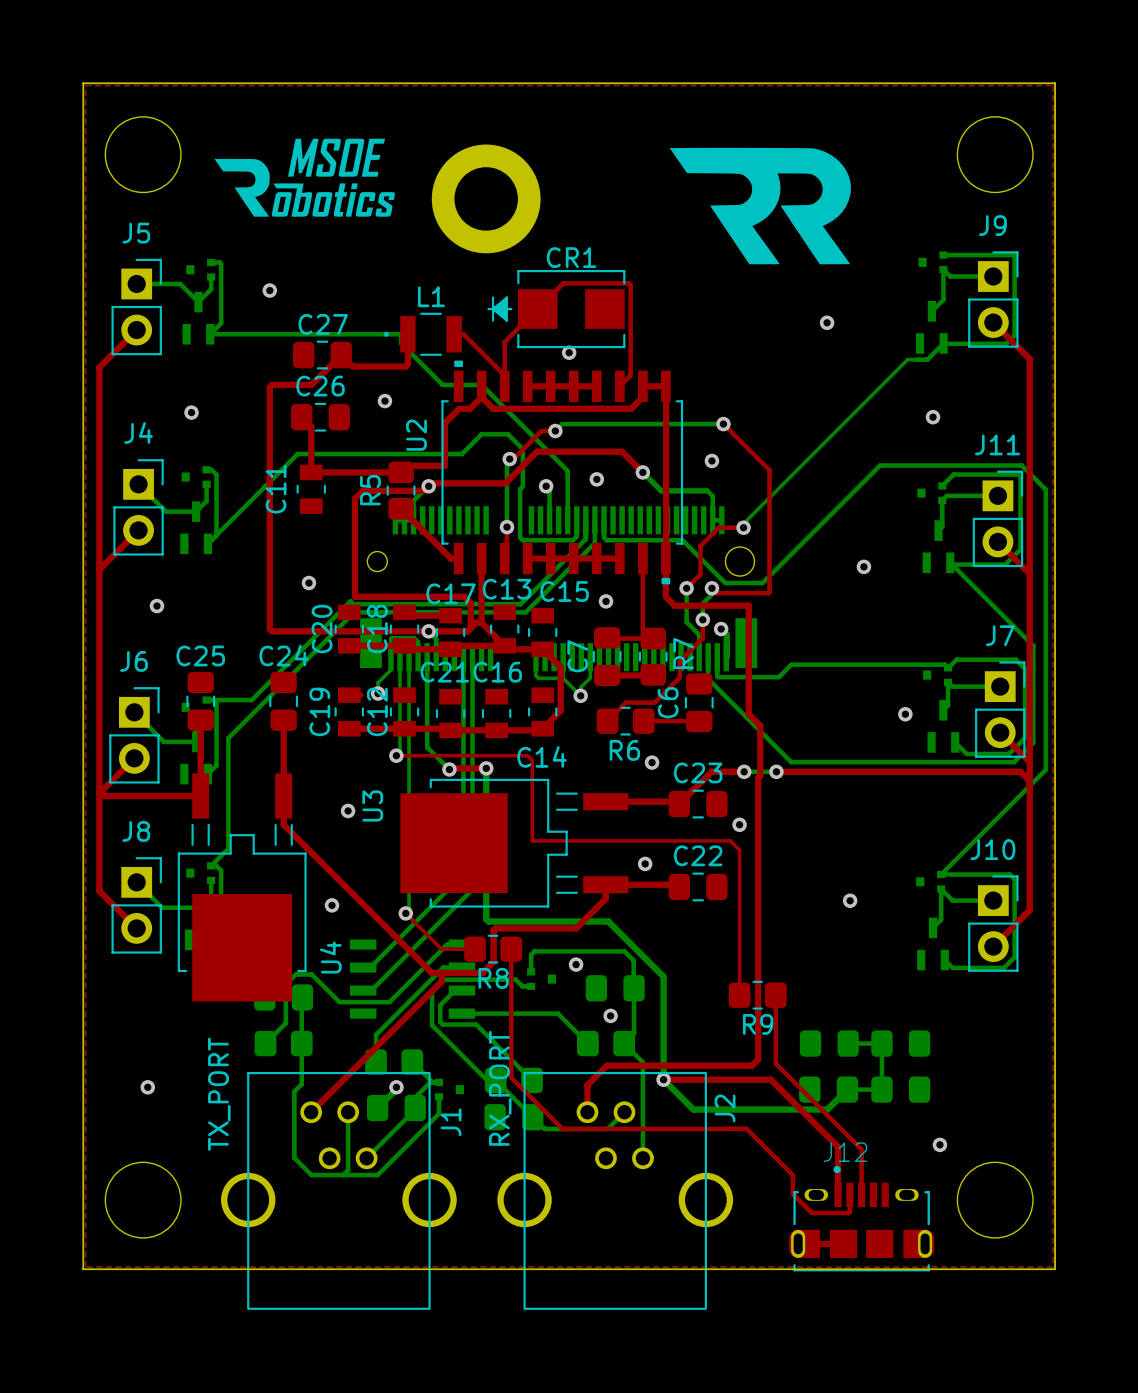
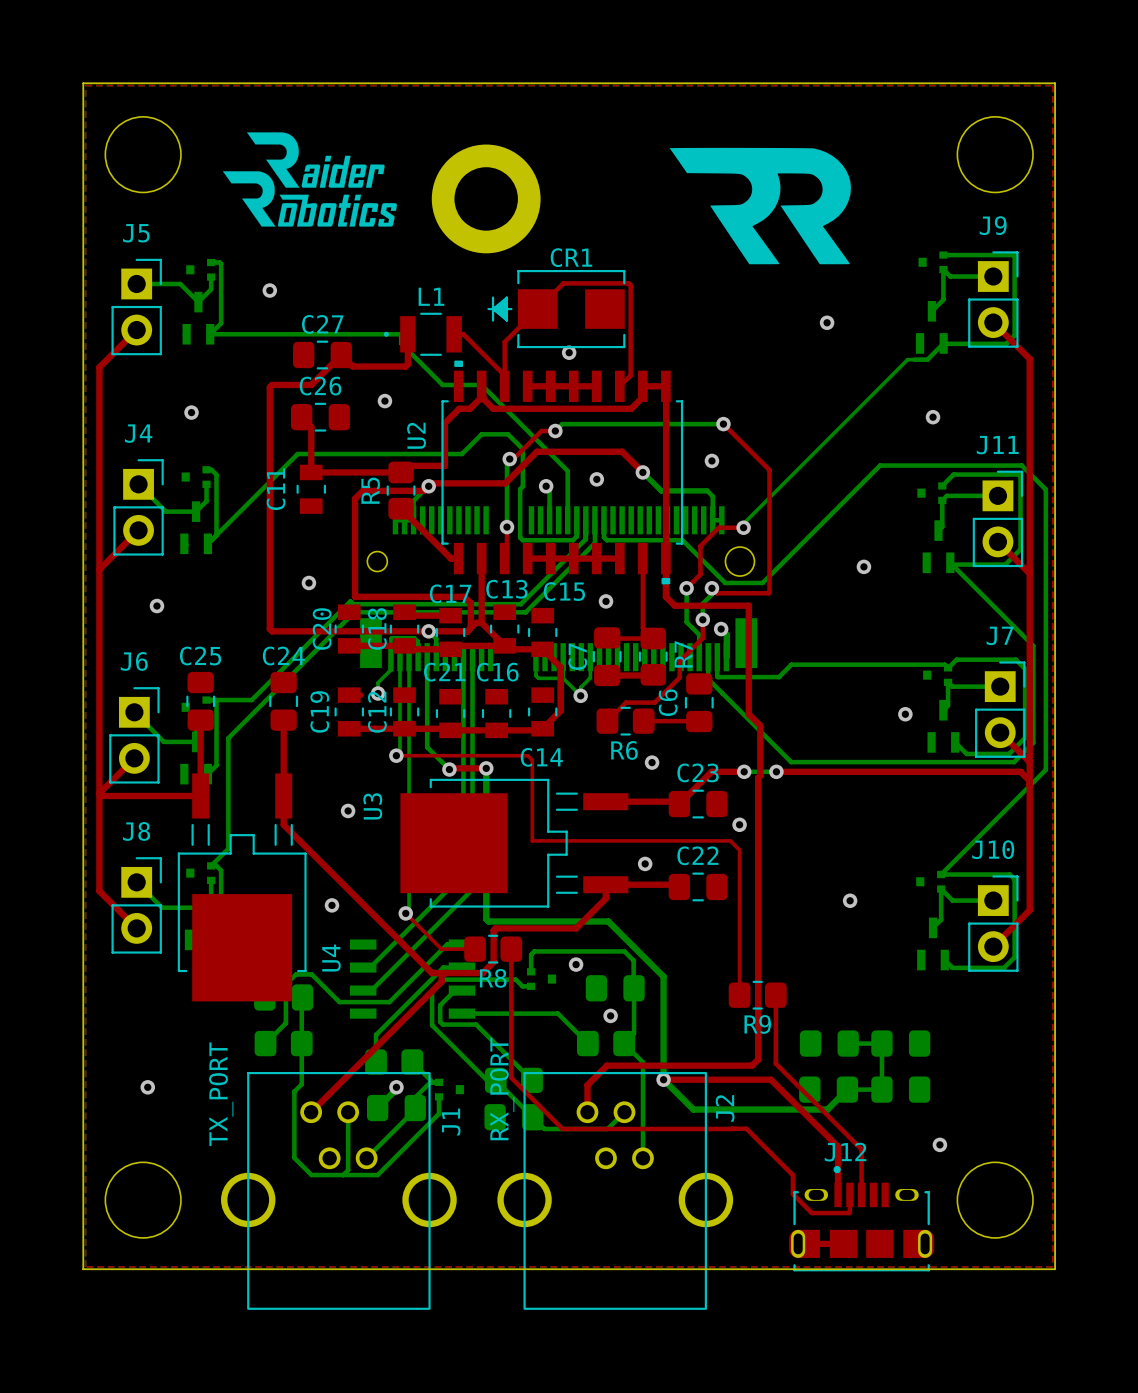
drawing: none -> [222, 132, 397, 227]
drawing shape: [214, 138, 395, 217] -> [301, 164, 321, 188]

